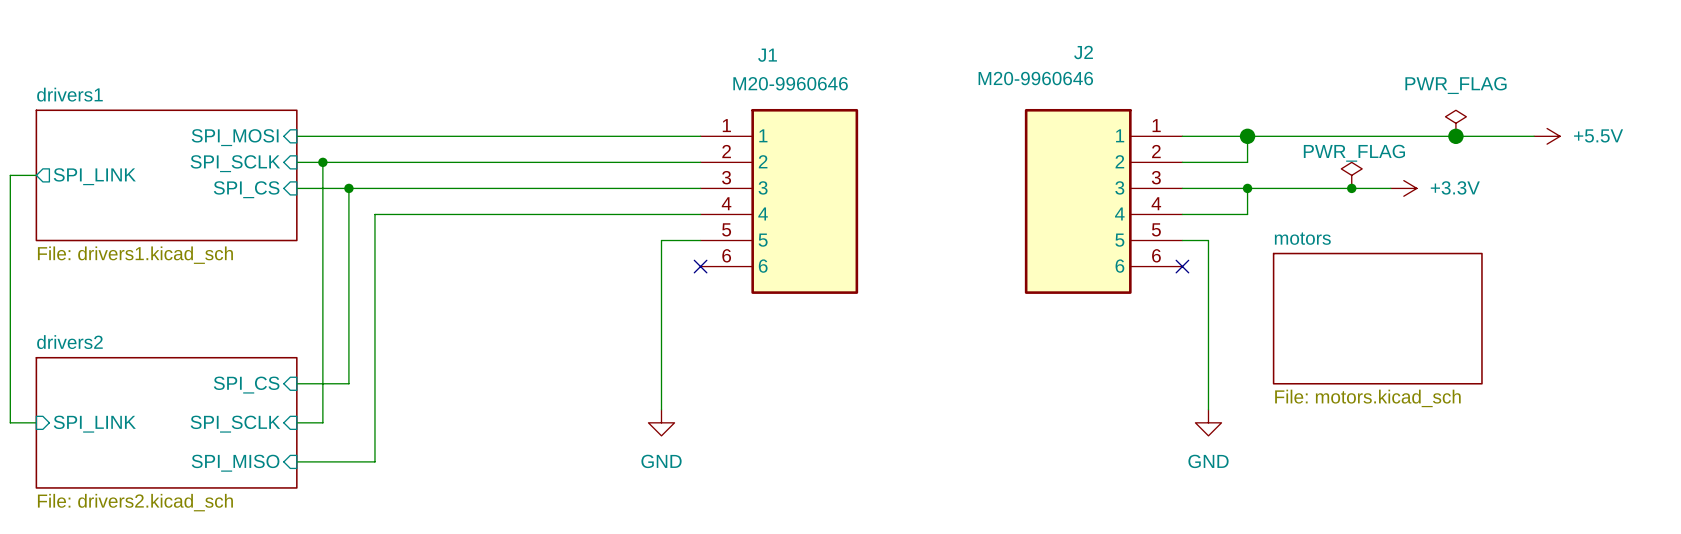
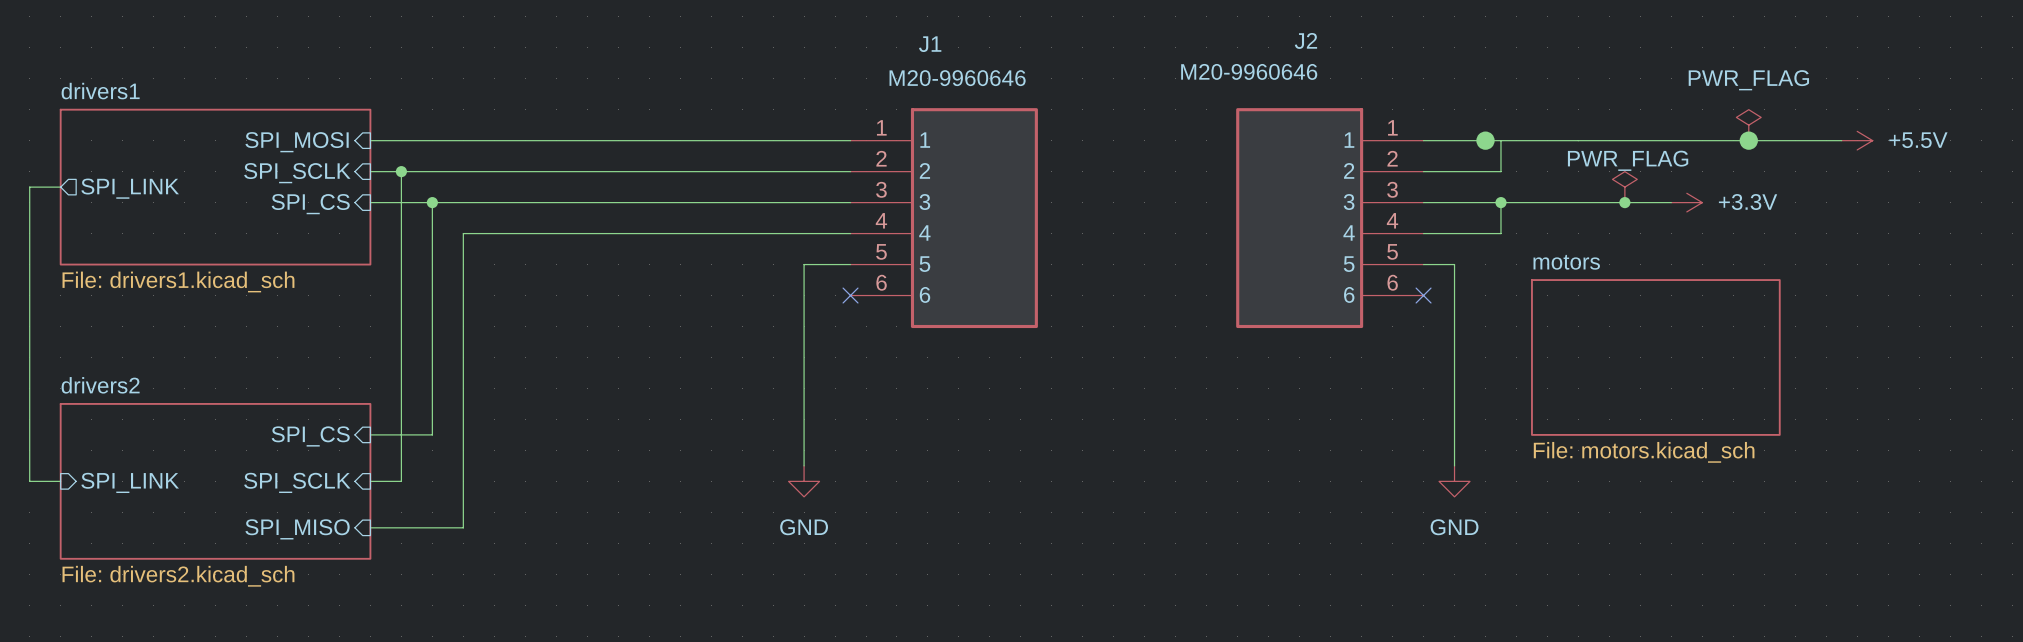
junction position: (1247, 136) -> (1485, 140)

